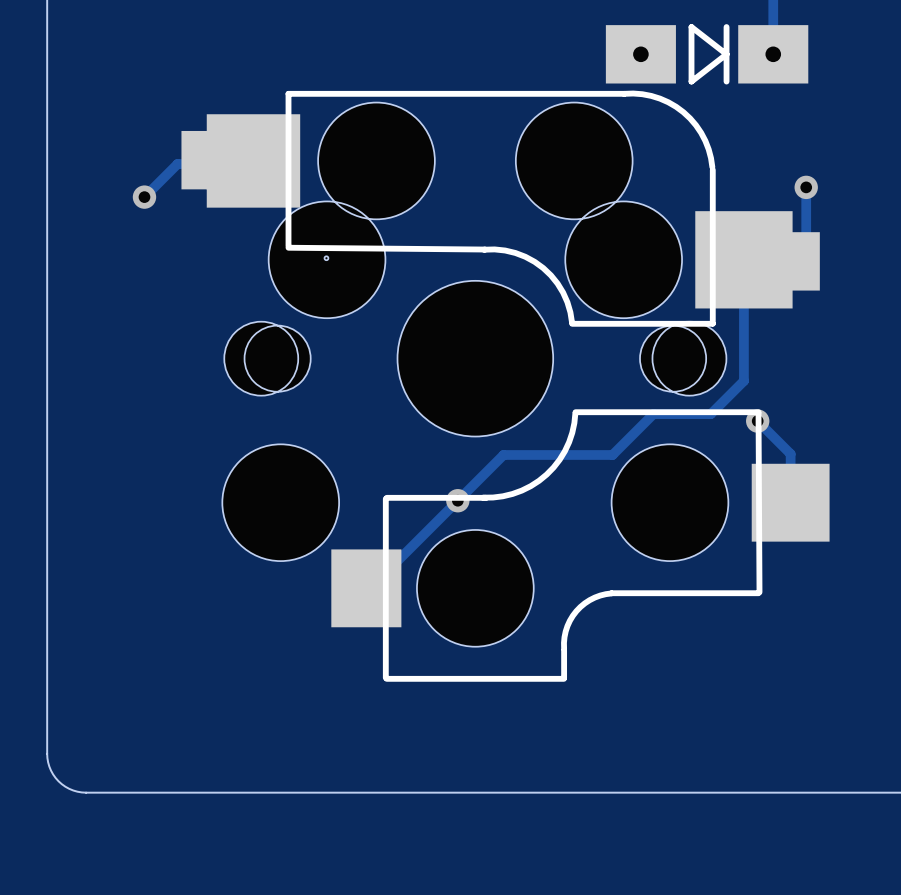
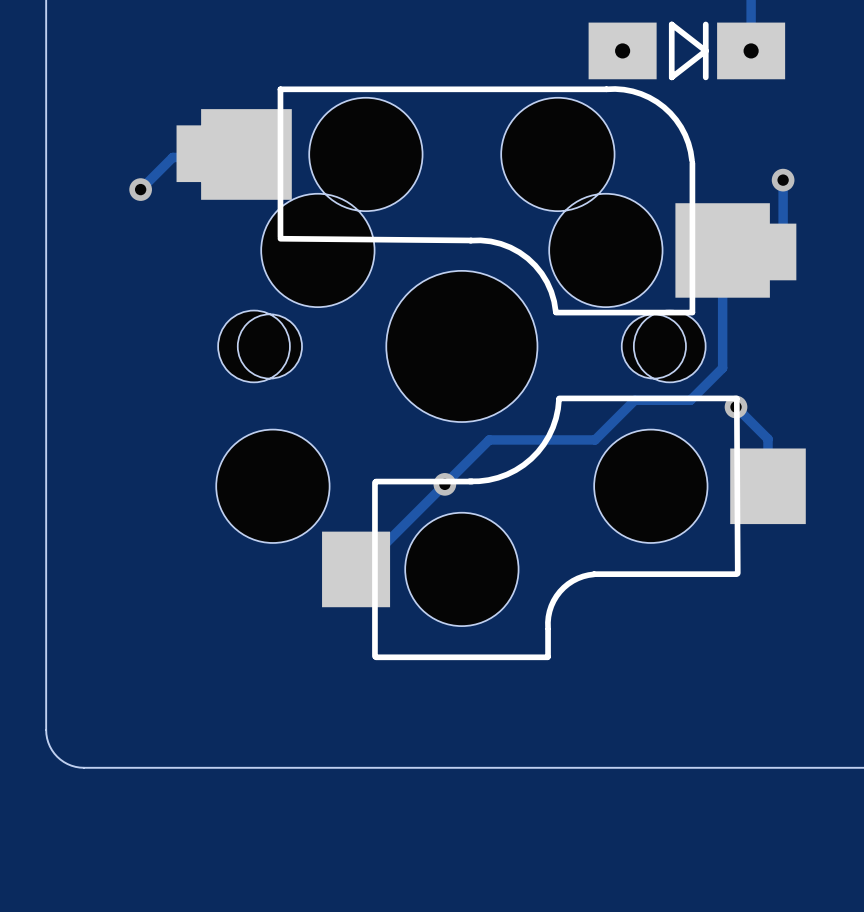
part footprint: [181, 90, 830, 682] -> [176, 86, 806, 661]

